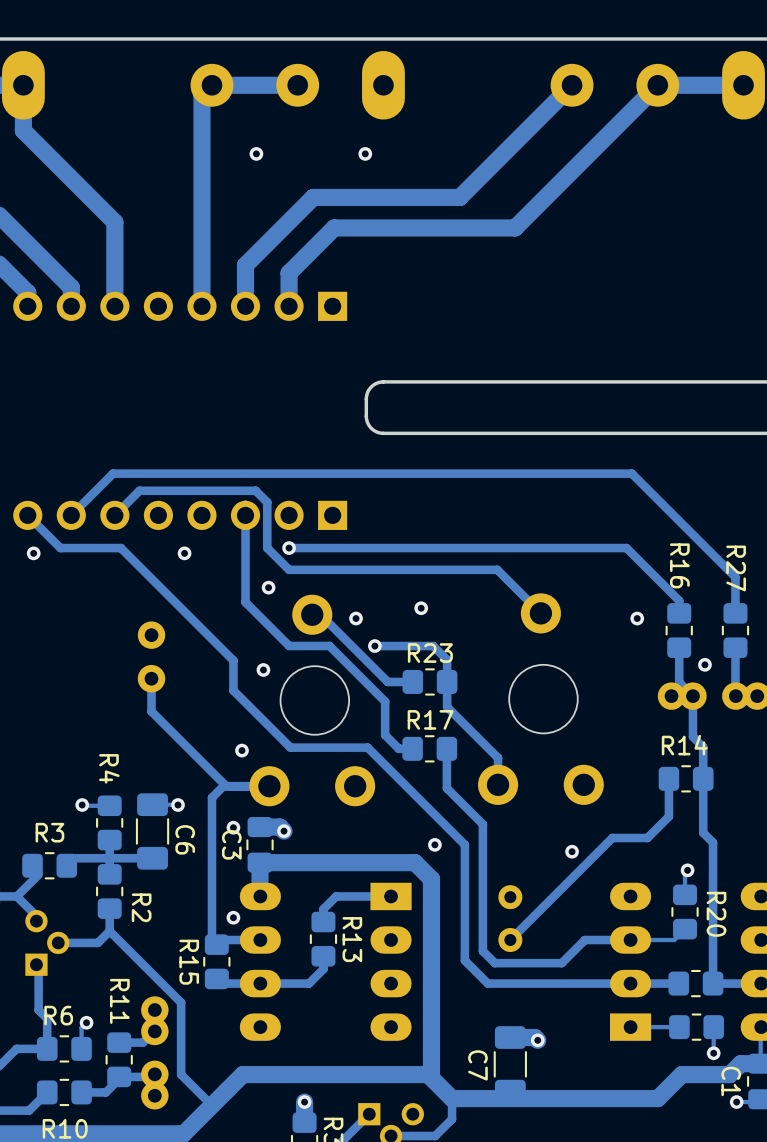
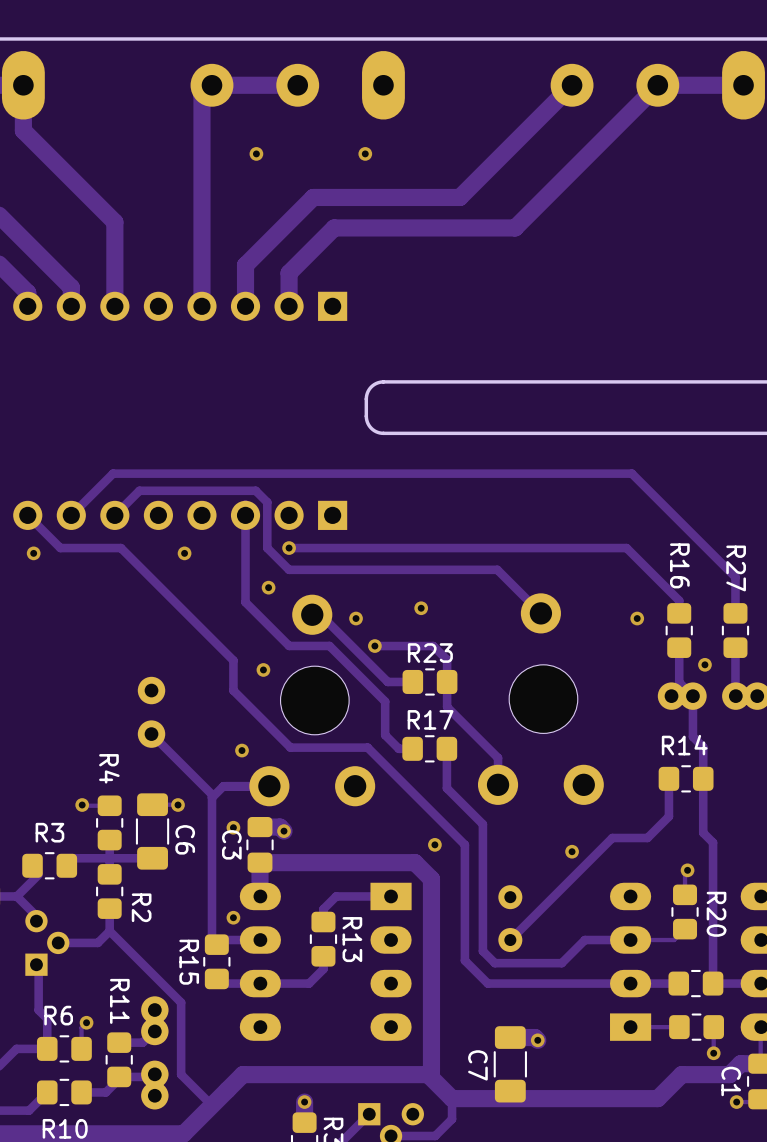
part position: (151, 656) -> (151, 712)
track: (151, 678) (151, 711) (226, 786) -> none
track: none -> (151, 734) (212, 794) (212, 797)

